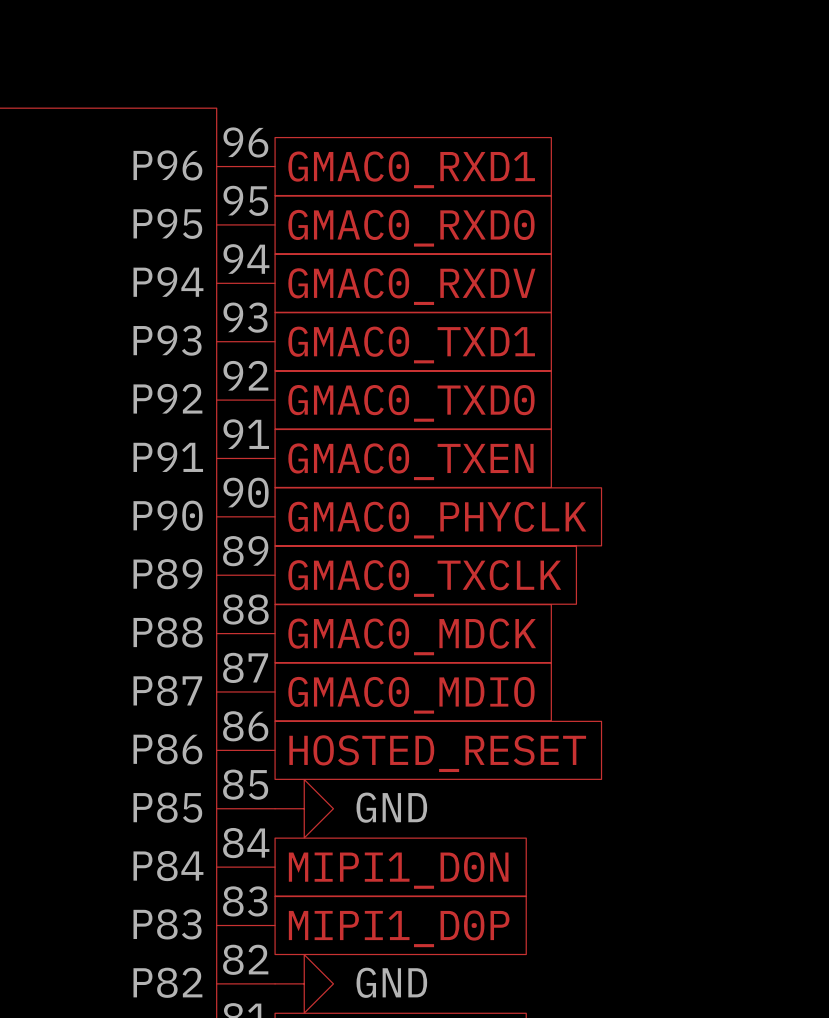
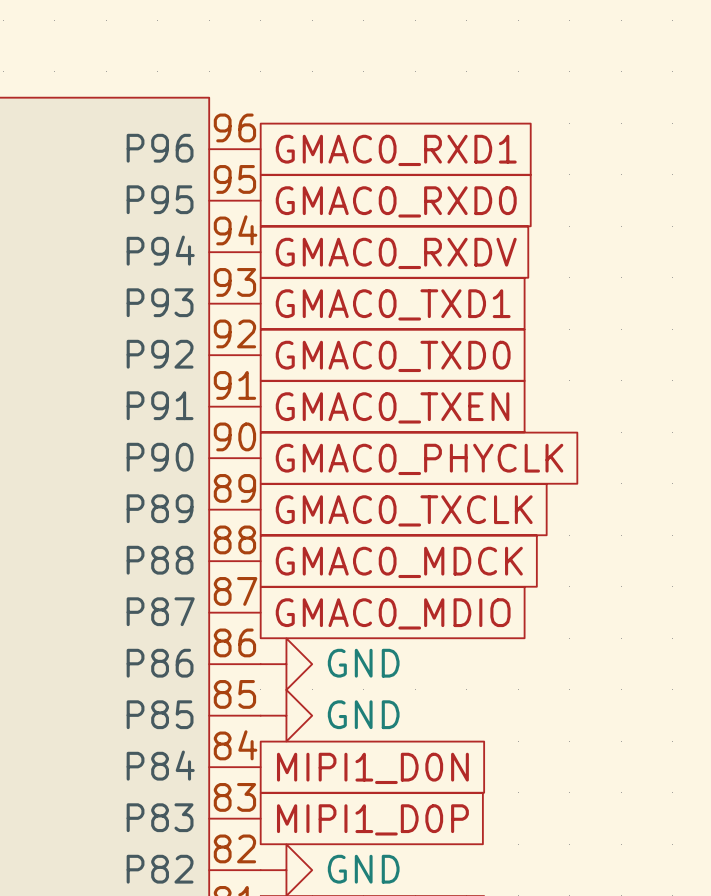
power symbol: none -> GND (286, 664)
global label: HOSTED_RESET (437, 753) -> none

